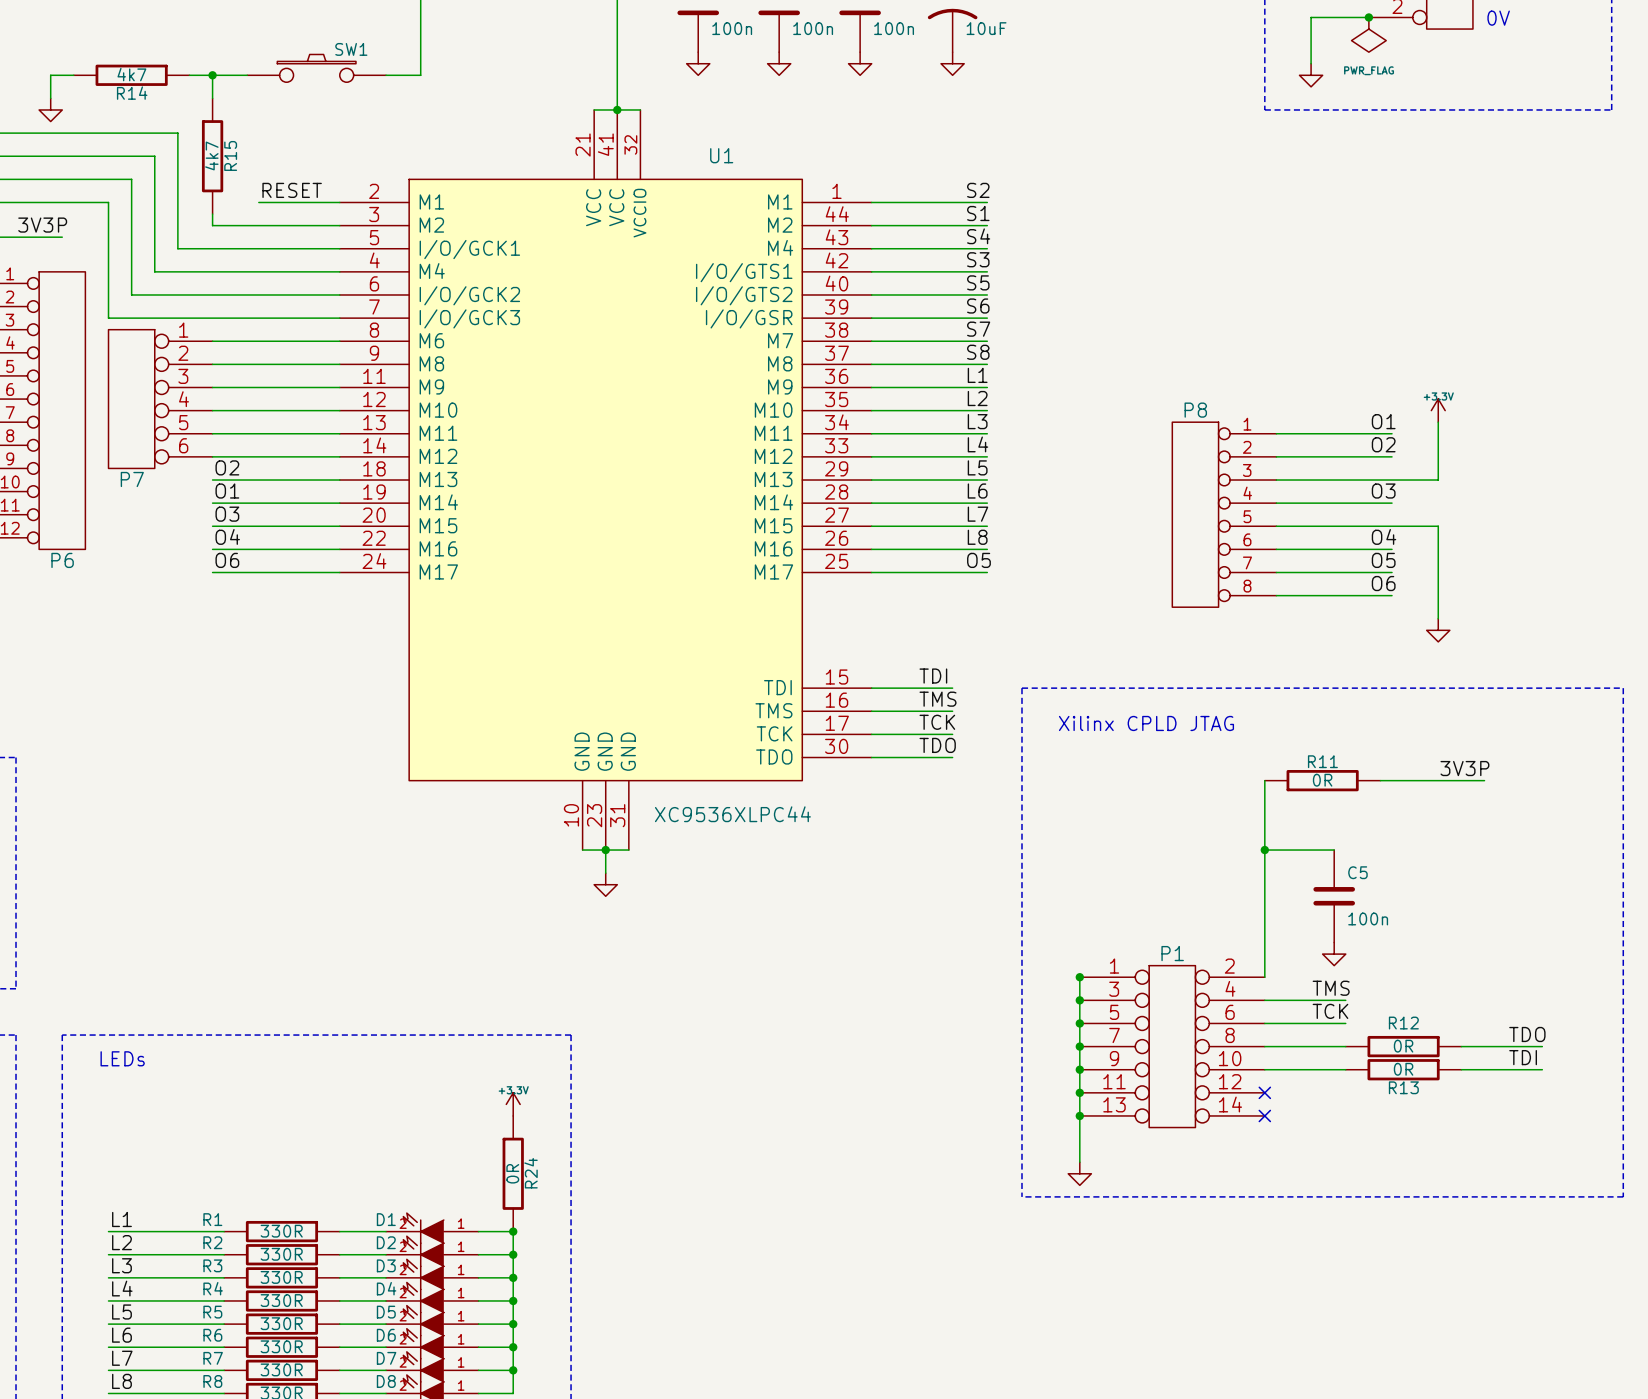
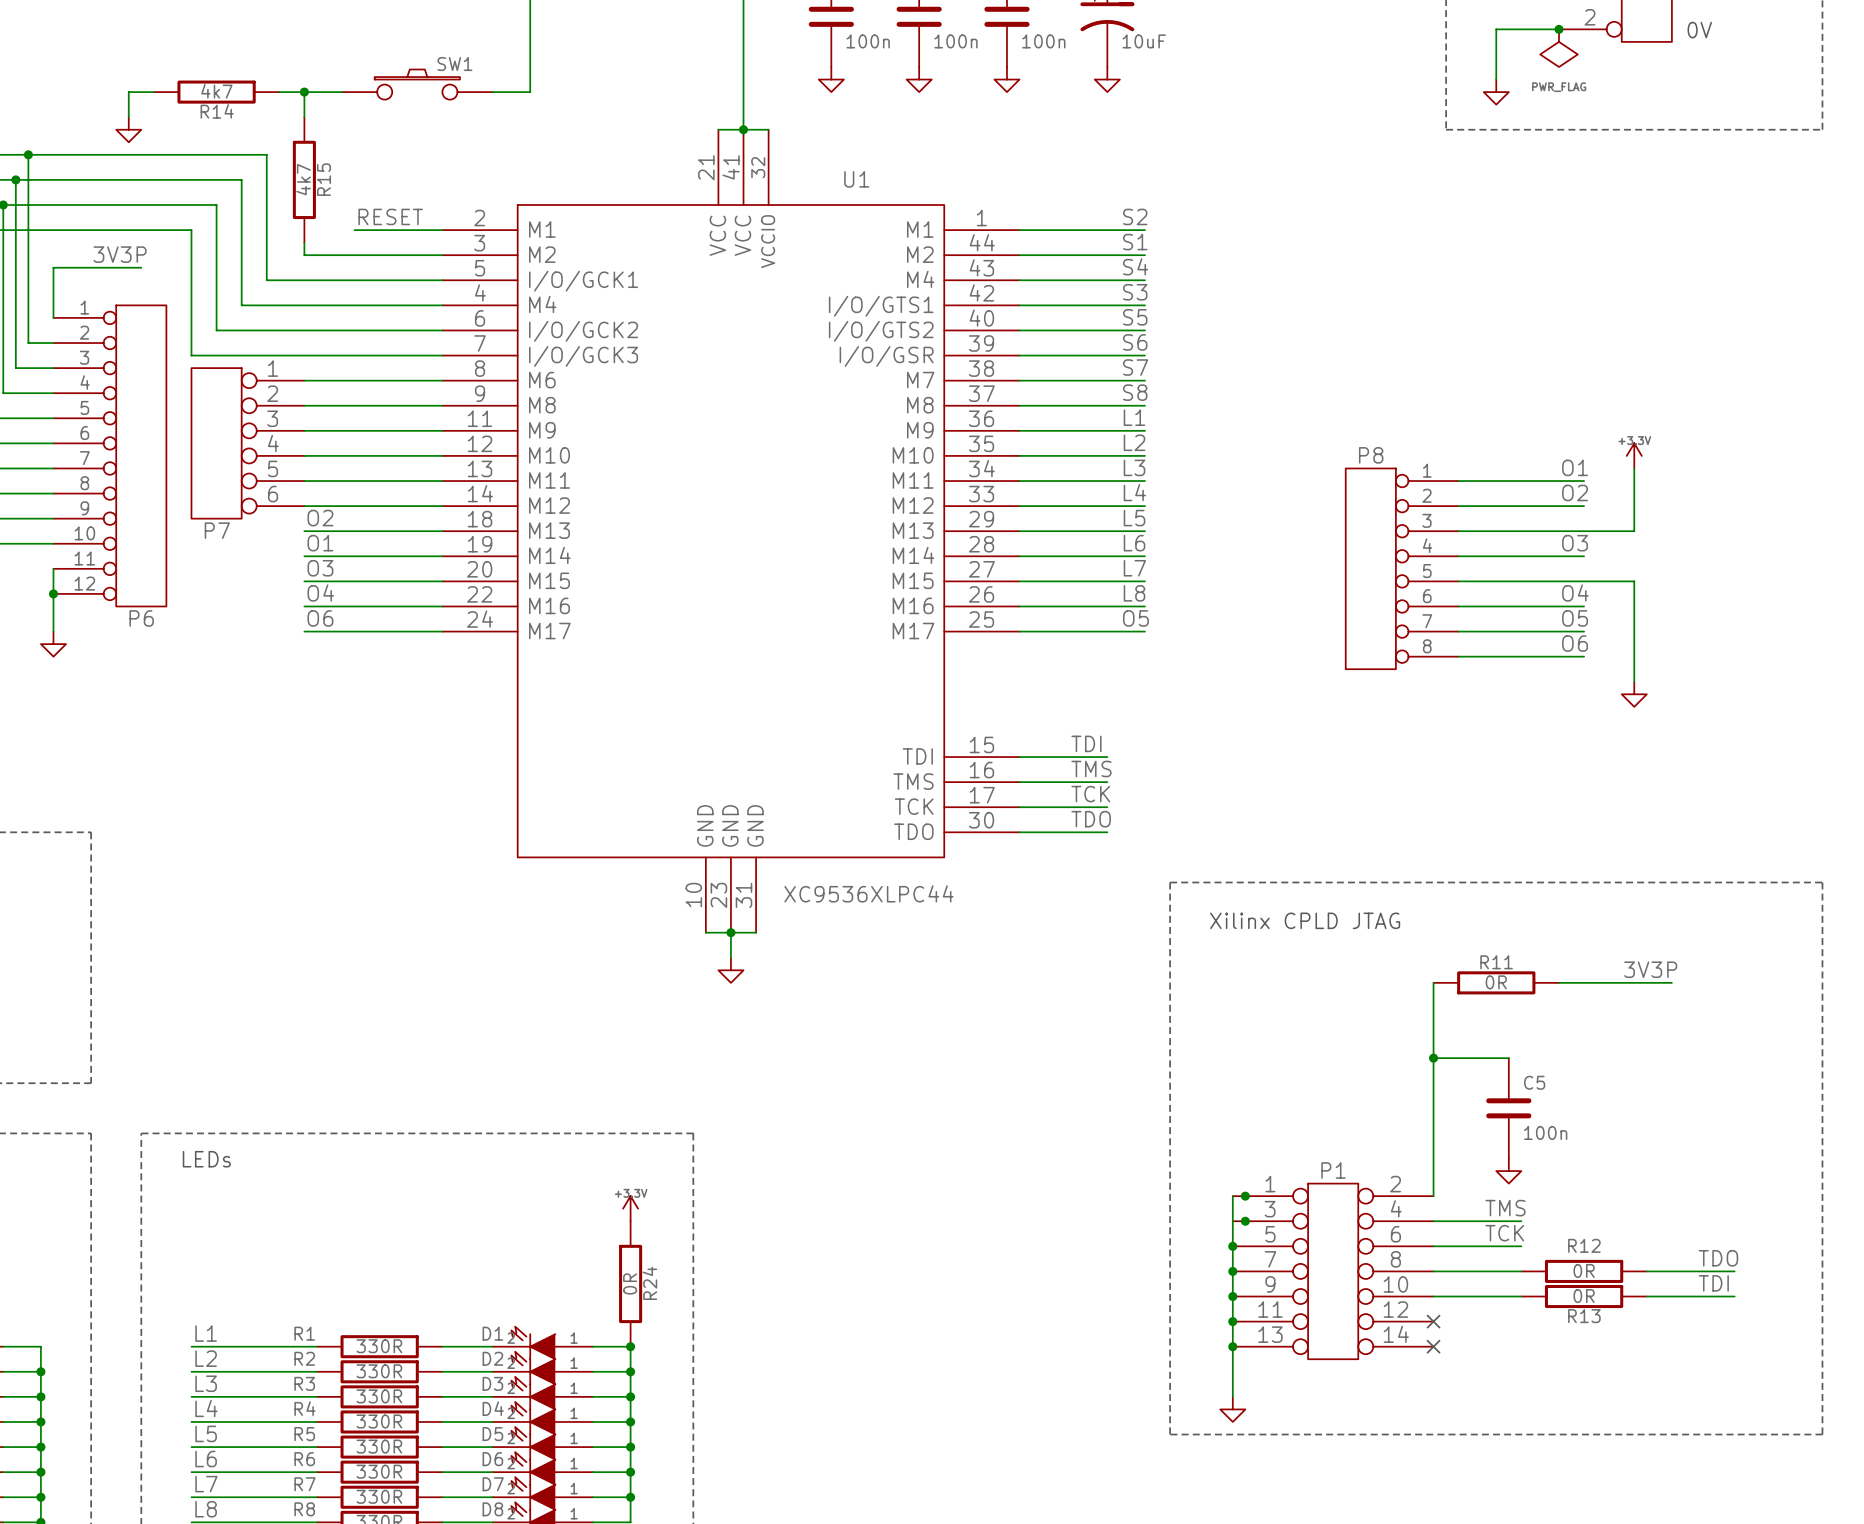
line: (1021, 688) (1021, 1196) (1623, 1196) (1623, 688) (1021, 688) -> (1170, 882) (1170, 1434) (1822, 1434) (1822, 882) (1170, 882)
text position: Xilinx CPLD JTAG (1146, 723) -> Xilinx CPLD JTAG (1305, 920)
label position: 3V3P (1464, 768) -> 3V3P (1650, 969)
wire: (1264, 780) (1264, 977) -> (1433, 982) (1433, 1196)
R11 position: (1322, 780) -> (1496, 982)
wire: (1380, 780) (1484, 780) -> (1559, 982) (1671, 982)
wire: (1264, 850) (1334, 850) -> (1433, 1058) (1508, 1058)
junction: (1264, 850) -> none
C5 position: (1334, 896) -> (1508, 1108)
power symbol position: (1334, 954) -> (1508, 1171)
junction: none -> (1433, 1058)
wire: (1079, 977) (1079, 1162) -> (1232, 1196) (1232, 1396)
junction: (1079, 977) -> none
label position: TMS (1331, 988) -> TMS (1505, 1208)
junction: (1079, 1000) -> none
wire: (1264, 1000) (1345, 1000) -> (1433, 1221) (1521, 1221)
label position: TCK (1330, 1011) -> TCK (1504, 1233)
junction: (1079, 1023) -> none
wire: (1264, 1023) (1345, 1023) -> (1433, 1246) (1521, 1246)
label position: TDO (1527, 1034) -> TDO (1718, 1258)
junction: (1079, 1046) -> none
P1 position: (1172, 1046) -> (1333, 1271)
wire: (1264, 1046) (1345, 1046) -> (1433, 1271) (1521, 1271)
R12 position: (1403, 1046) -> (1584, 1271)
wire: (1461, 1046) (1542, 1046) -> (1646, 1271) (1734, 1271)
label position: TDI (1523, 1057) -> TDI (1713, 1283)
junction: (1079, 1069) -> none
wire: (1264, 1069) (1345, 1069) -> (1433, 1296) (1521, 1296)
R13 position: (1403, 1069) -> (1584, 1296)
wire: (1461, 1069) (1542, 1069) -> (1646, 1296) (1734, 1296)
no-connect mark: (1264, 1092) -> none
no-connect mark: (1264, 1115) -> none
junction: none -> (1232, 1246)
junction: none -> (1232, 1271)
power symbol position: (1079, 1173) -> (1232, 1409)
junction: none -> (1232, 1296)
junction: none -> (1232, 1321)
no-connect mark: none -> (1433, 1321)
junction: none -> (1232, 1346)
no-connect mark: none -> (1433, 1346)

